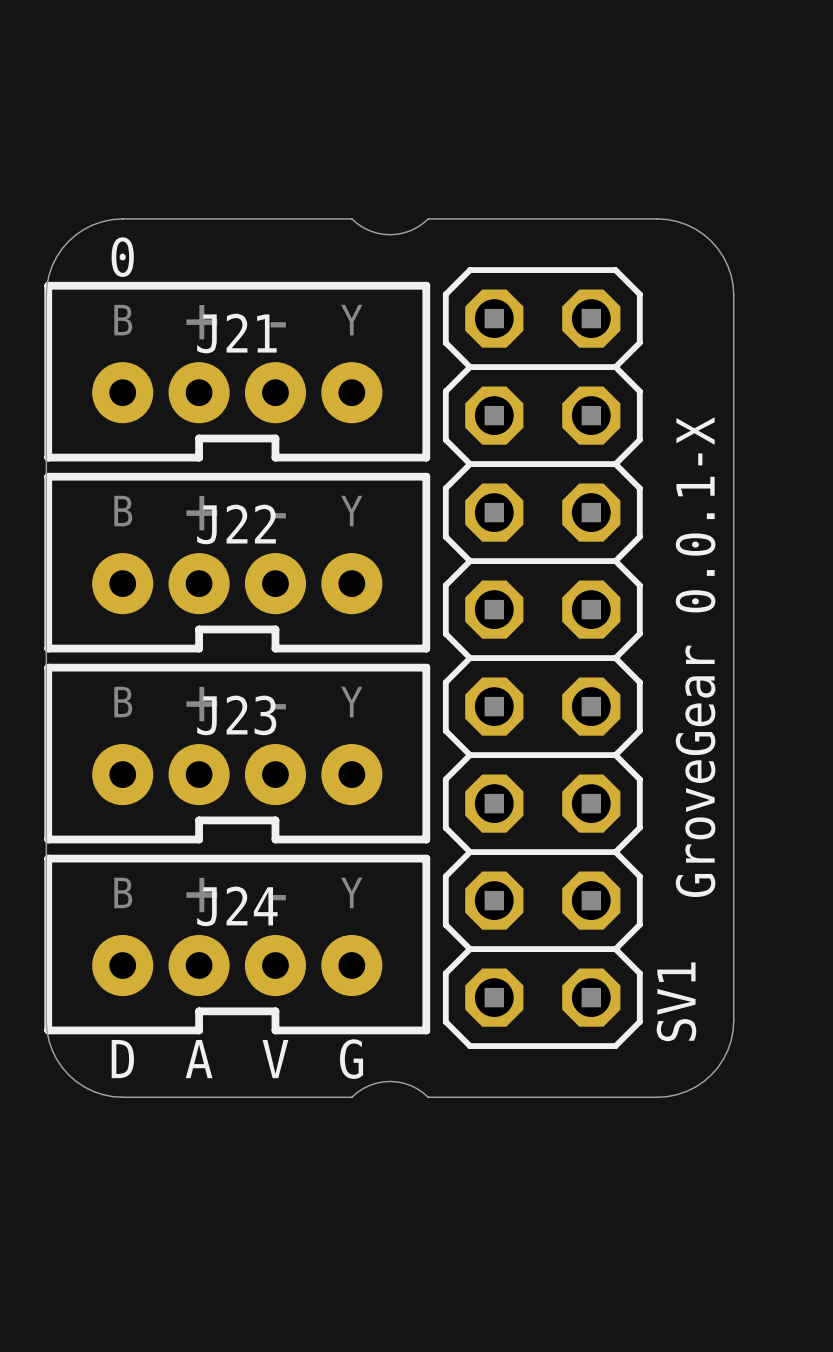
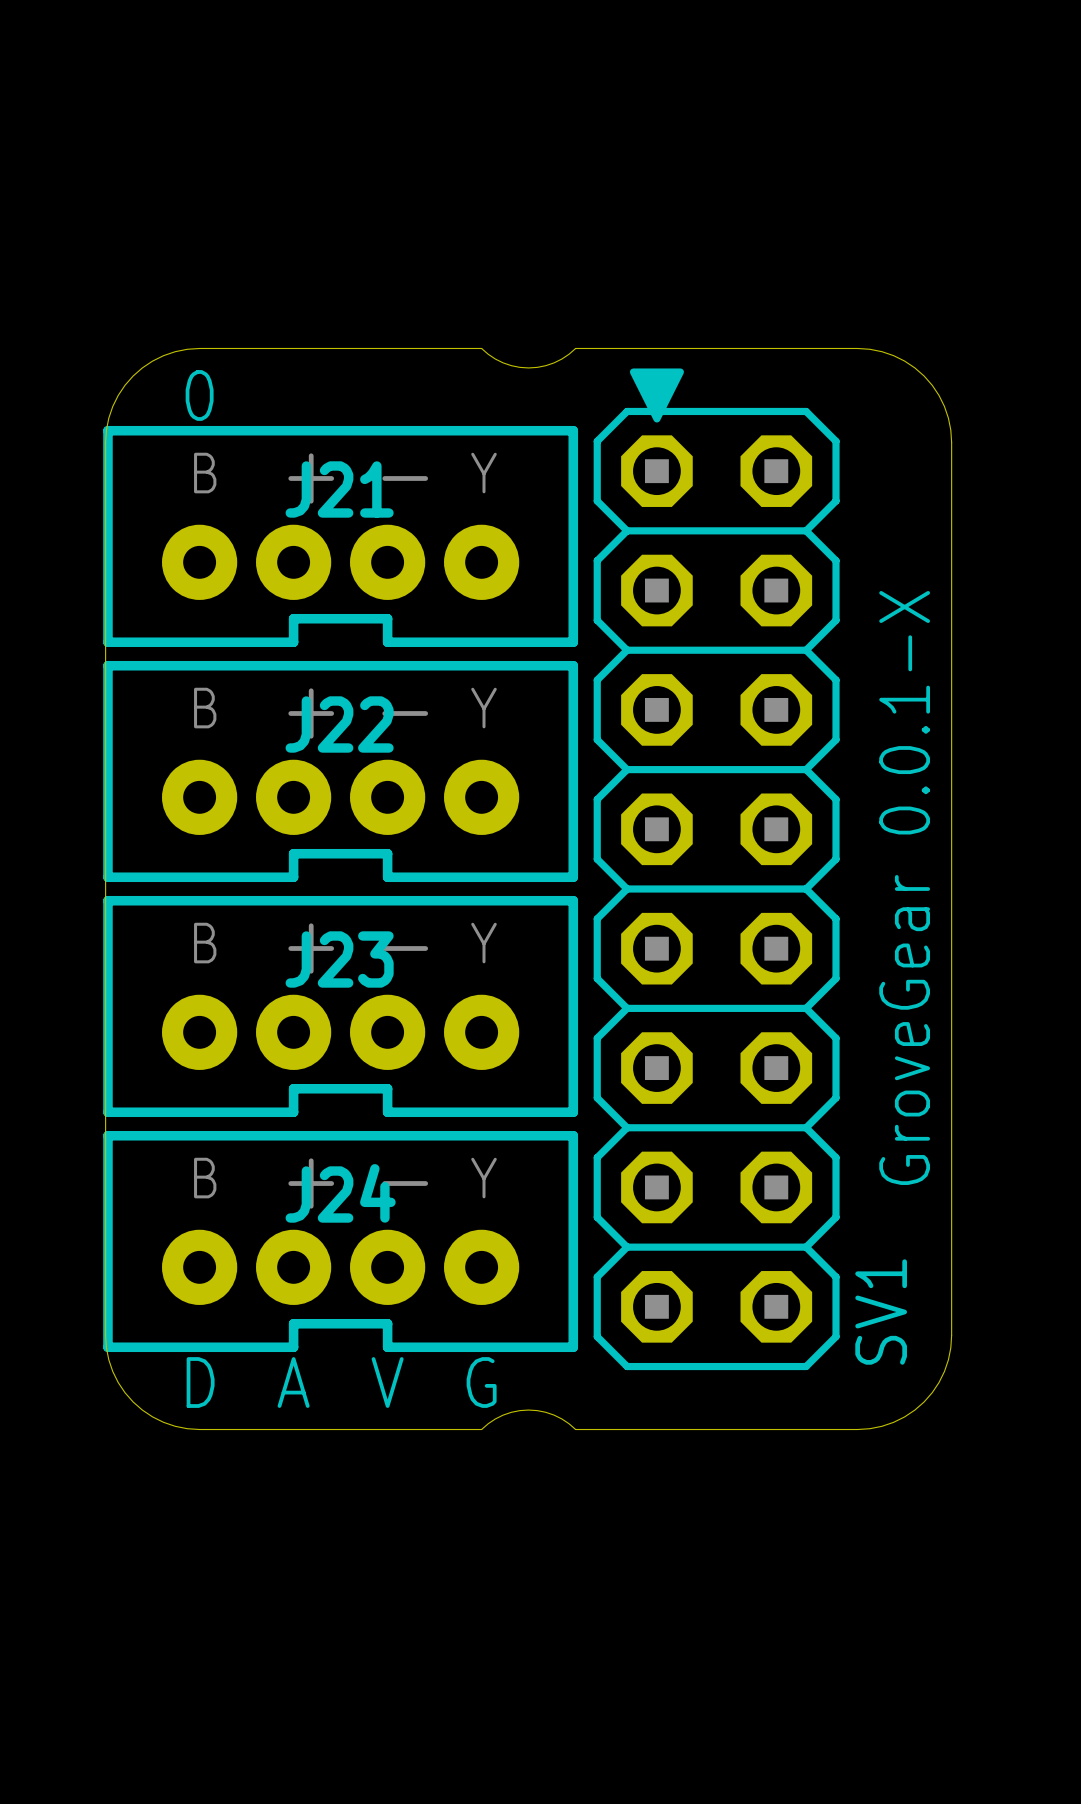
drawing: none -> [629, 368, 684, 423]

